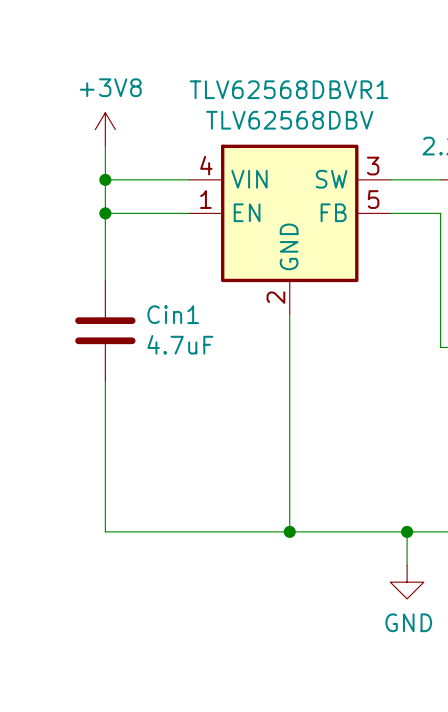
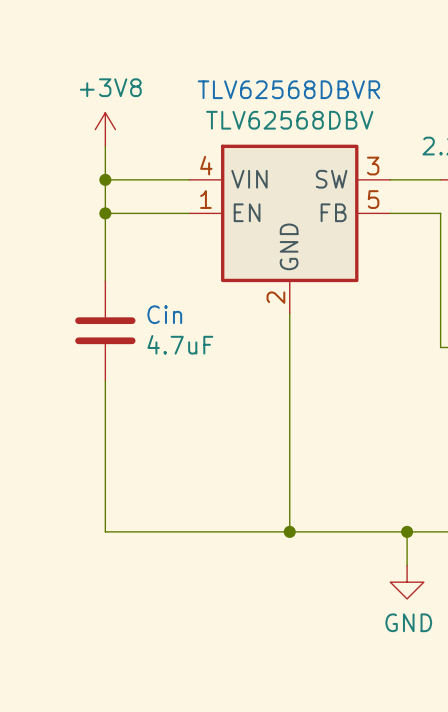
TLV62568DBVR1 name: TLV62568DBVR1 (288, 89) -> TLV62568DBVR (288, 89)
Cin1 name: Cin1 (173, 314) -> Cin (164, 314)

